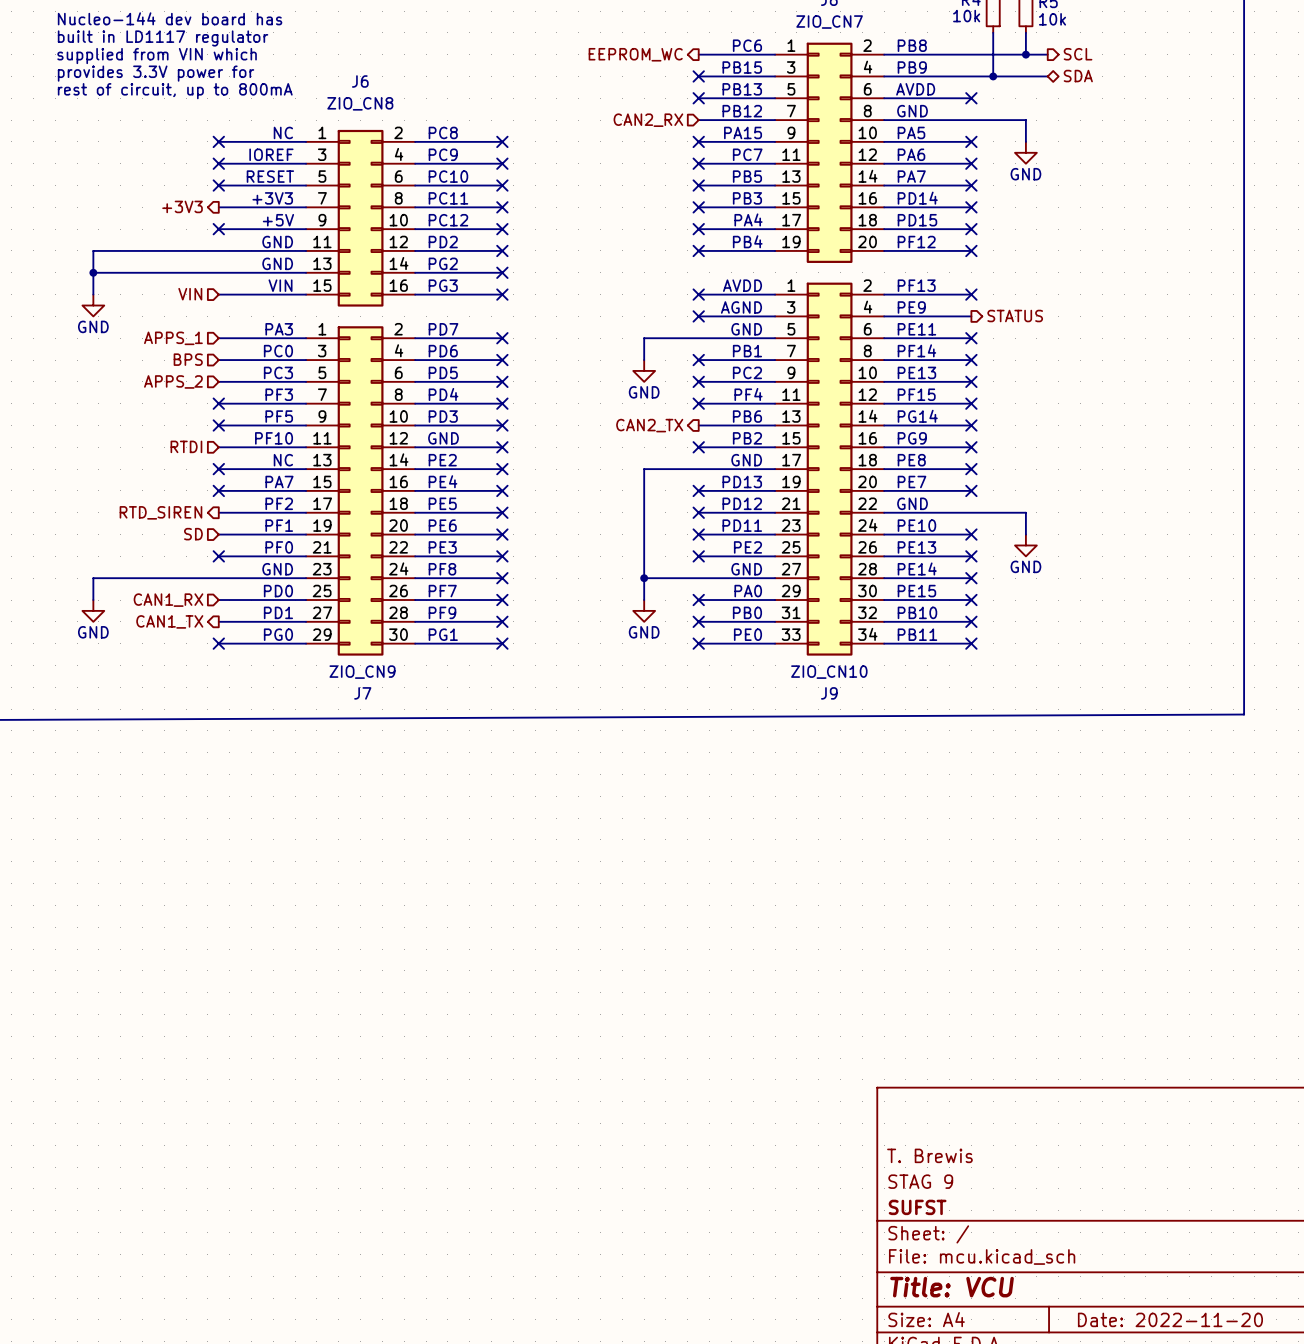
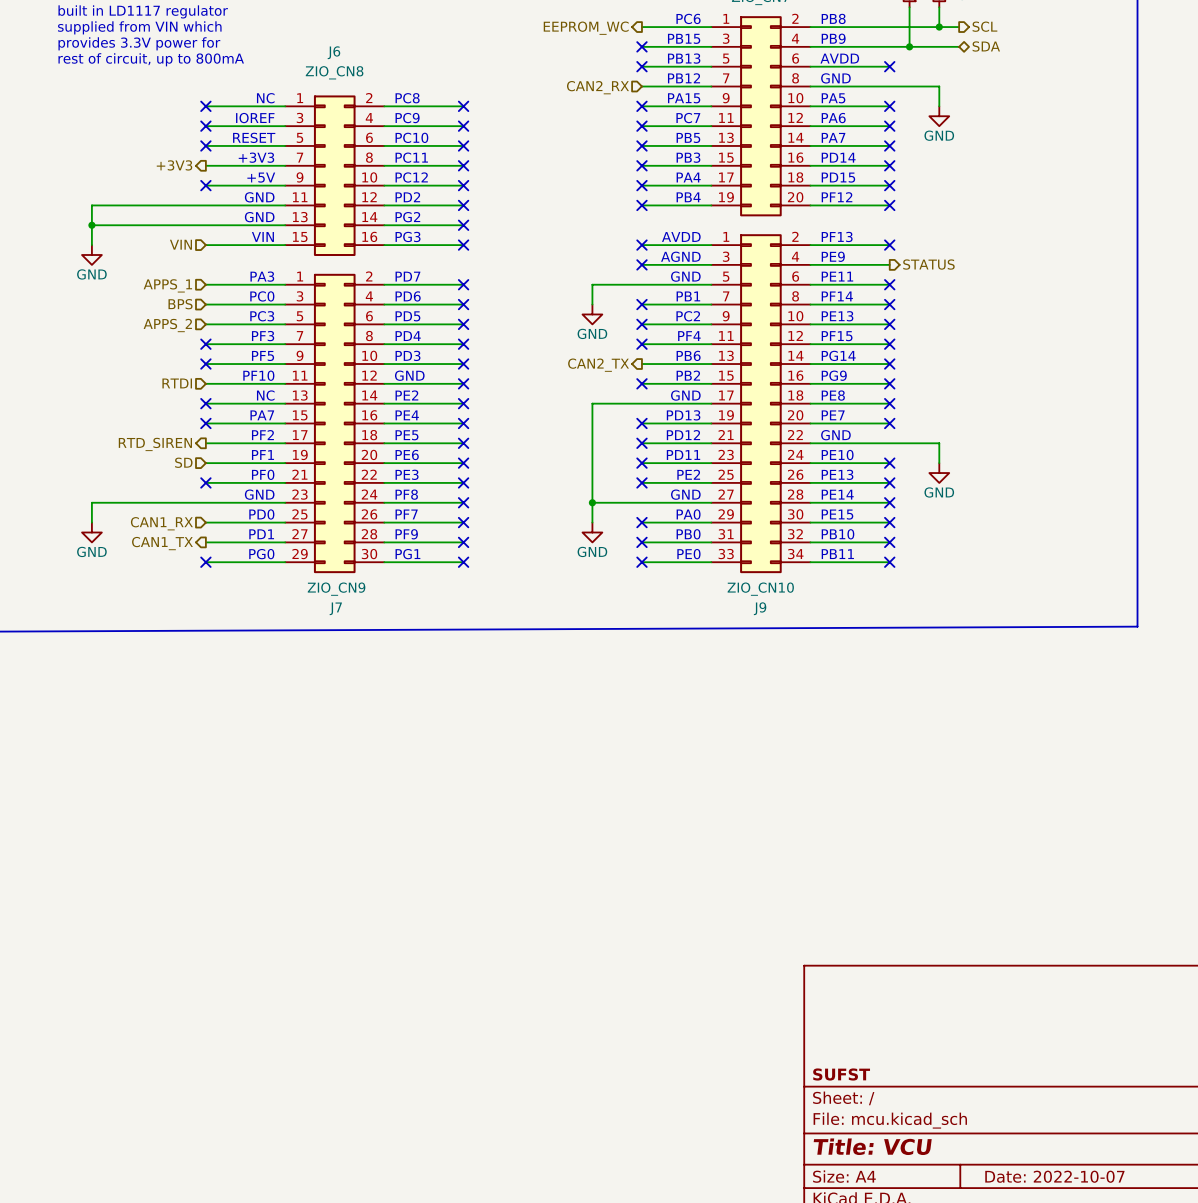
title block: T. Brewis (929, 1155) -> none
title block: STAG 9 (920, 1181) -> none
title block: Date: 2022-11-20 (1170, 1319) -> Date: 2022-10-07 (1054, 1176)

